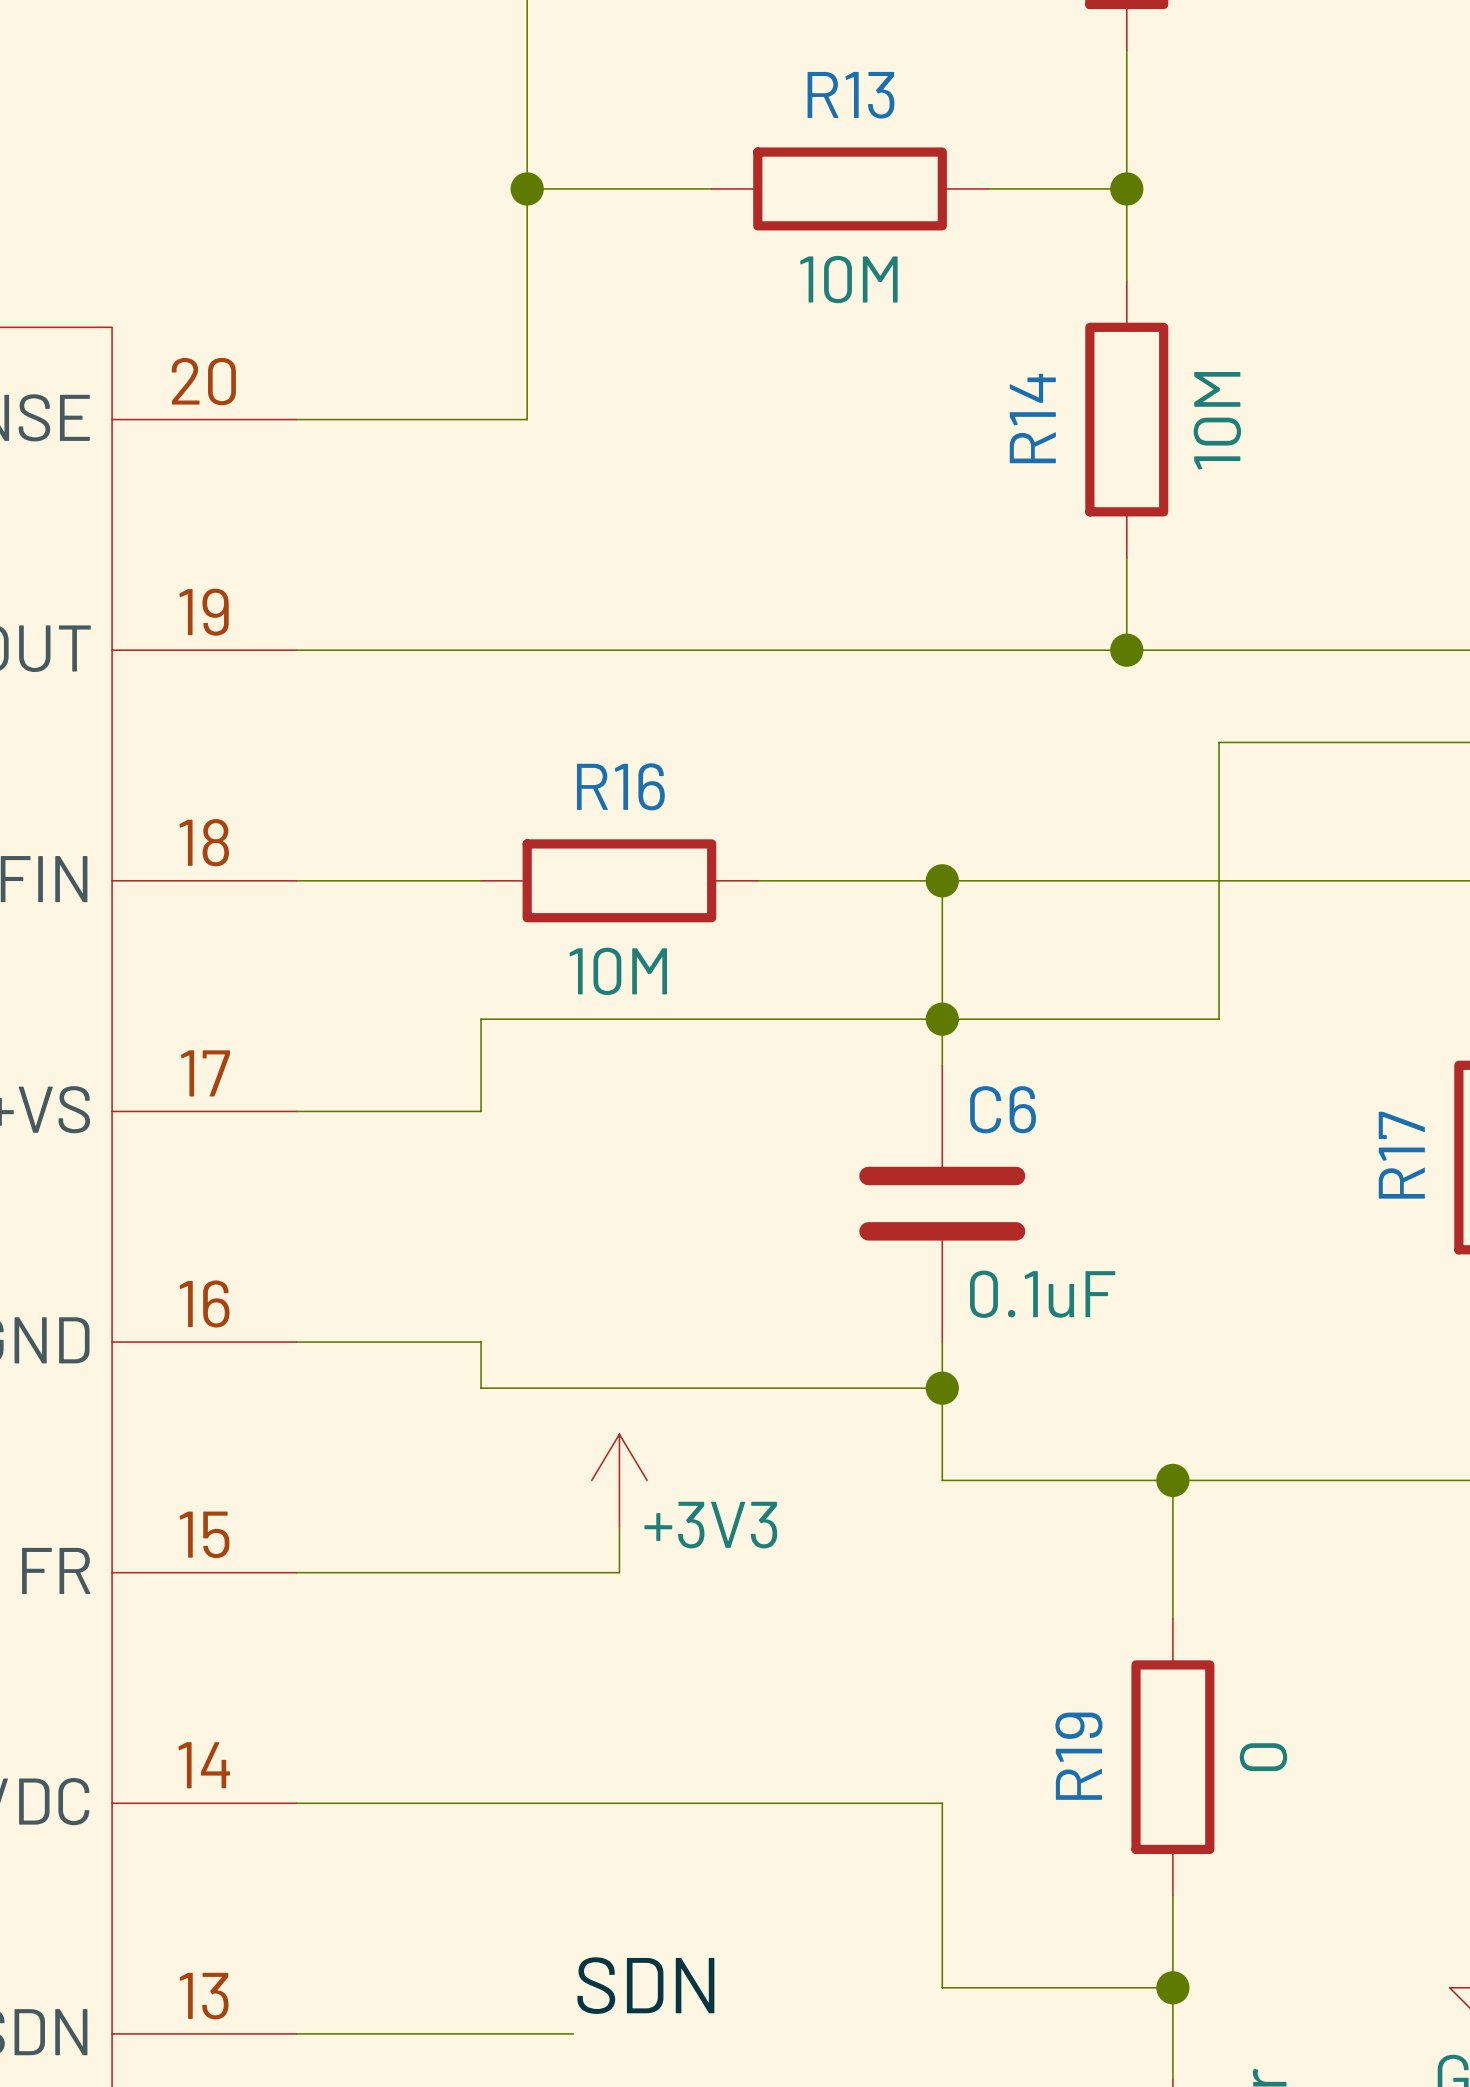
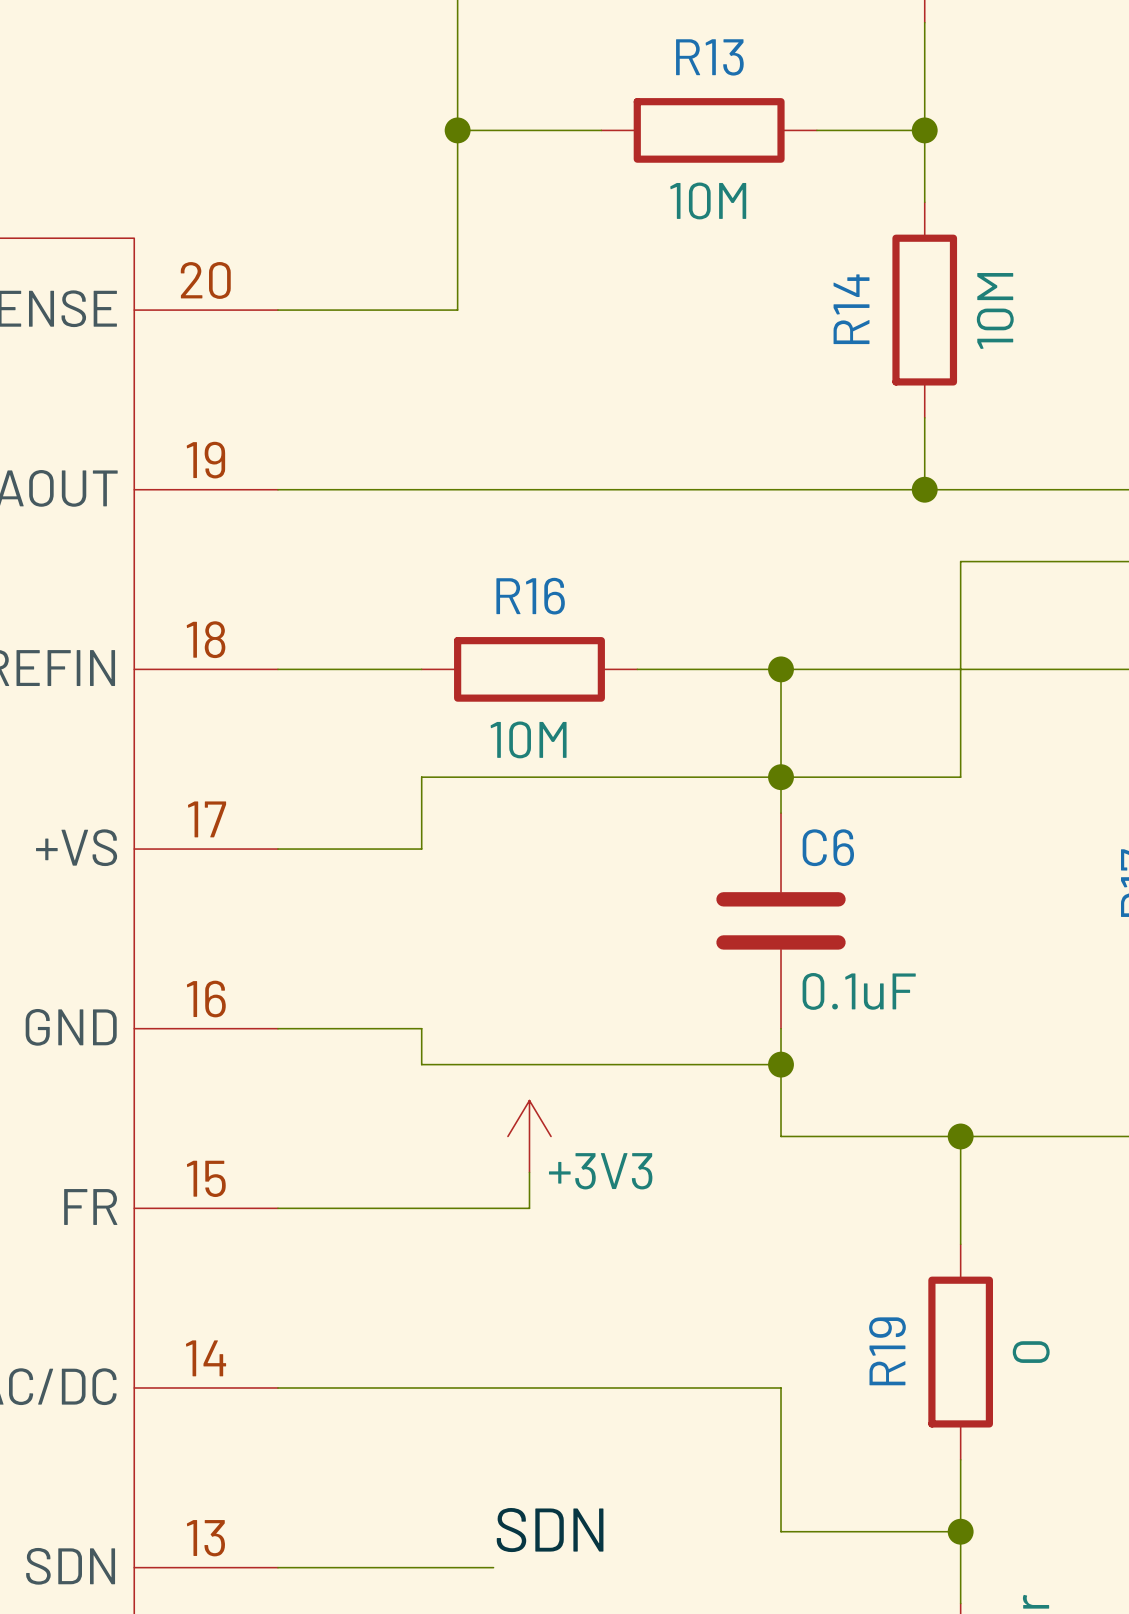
wire: (1219, 742) (1219, 1019) (1172, 1019) -> (996, 561) (960, 561) (960, 777)

